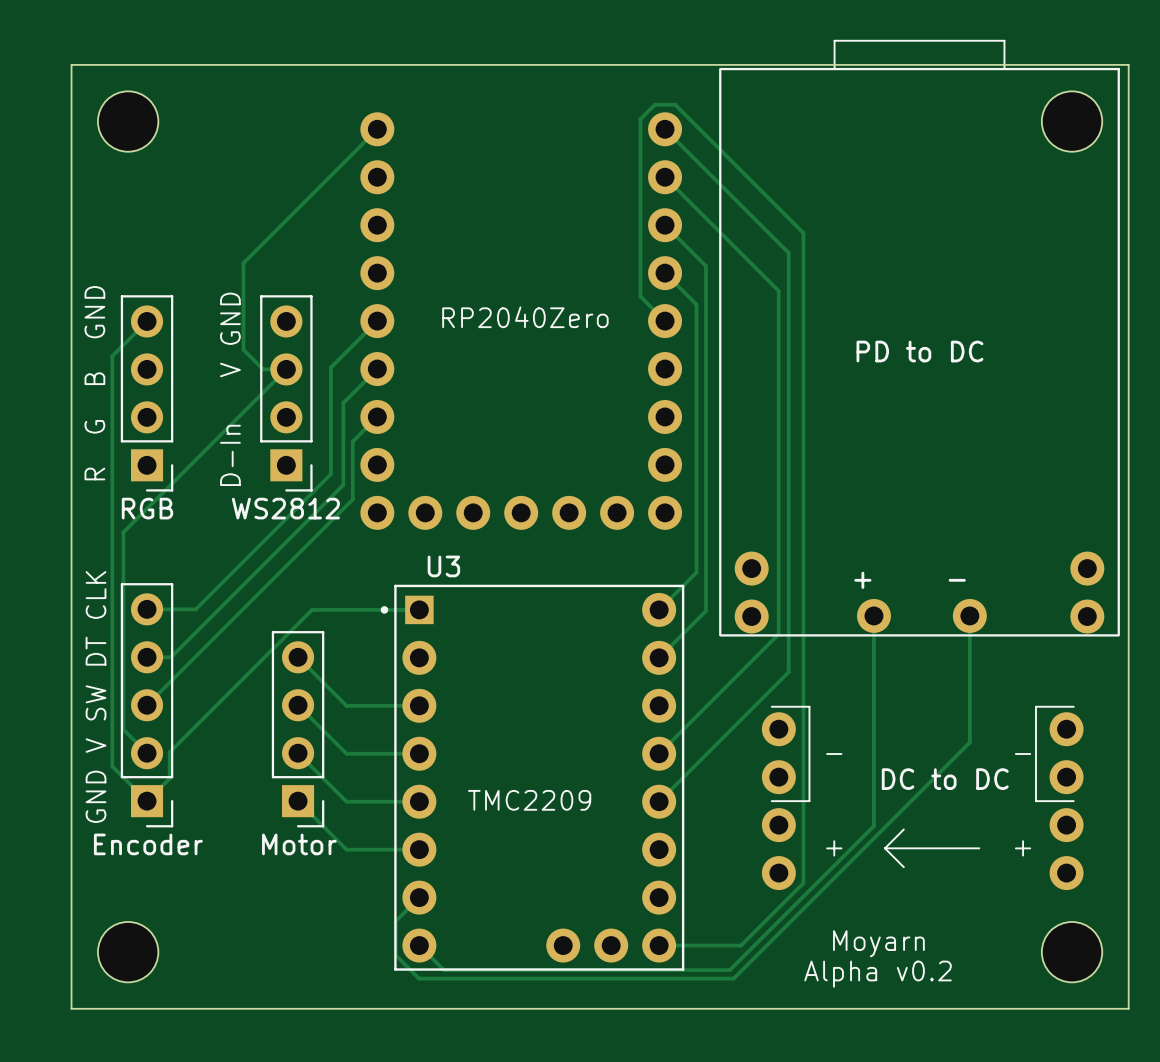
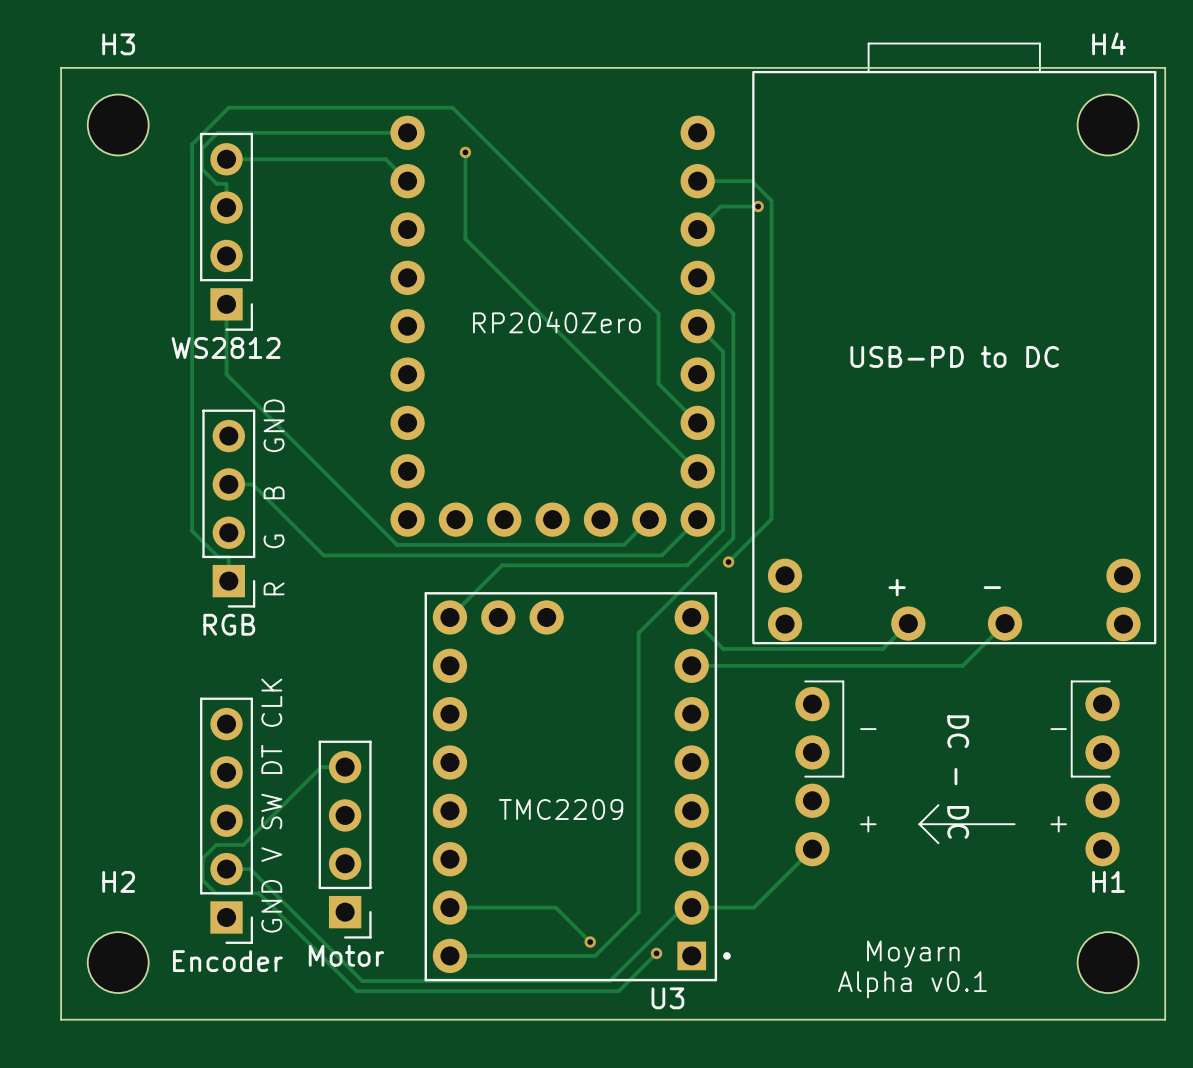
H4 name: none -> H4 (1108, 43)
board edge: (71, 64) (71, 1008) -> (99, 67) (61, 67) (61, 1019) (99, 1019)
H3: none -> (118, 125)
part: (128, 121) -> none
track: (377, 129) (243, 263) (243, 349) (263, 369) (286, 369) (123, 532) (123, 729) (147, 753) -> (407, 132) (217, 132) (201, 148) (201, 169) (216, 183) (226, 183) (226, 207)
track: (665, 129) (788, 252) (788, 672) (659, 801) -> none
track: none -> (465, 152) (465, 239) (697, 471)
via: none -> (465, 152)
track: none -> (226, 159) (385, 159) (407, 181)
track: (665, 177) (778, 290) (778, 634) (659, 753) -> (697, 181) (752, 181) (771, 200) (771, 519) (728, 562)
via: none -> (758, 206)
track: (665, 225) (706, 266) (706, 610) (659, 657) -> (697, 229) (720, 206) (758, 206)
track: none -> (226, 304) (226, 374) (397, 544) (624, 544) (649, 519)
track: (696, 304) (696, 572) (659, 609) -> (908, 623) (882, 648) (723, 648) (691, 617)
track: (147, 321) (112, 356) (112, 766) (147, 801) (169, 778) (169, 752) (312, 609) (419, 609) -> none
track: (377, 321) (330, 367) (330, 474) (195, 609) (147, 609) -> none
track: (665, 321) (640, 296) (640, 119) (654, 104) (675, 104) (803, 232) (803, 883) (741, 945) (659, 945) -> (697, 326) (723, 351) (723, 529) (687, 565) (502, 565) (449, 617)
text: PD to DC (919, 351) -> USB-PD to DC (954, 356)
track: (377, 369) (343, 403) (343, 484) (171, 657) (147, 657) -> none
text: D-In V GND (230, 389) -> none
RGB: (147, 393) -> none
WS2812 position: (286, 393) -> (226, 231)
track: (377, 416) (352, 441) (352, 499) (147, 705) -> none
track: none -> (697, 422) (658, 383) (658, 313) (452, 107) (228, 107) (192, 144) (192, 531) (218, 557) (228, 557) (228, 581)
track: none -> (228, 484) (252, 484) (323, 555) (661, 555) (697, 519)
RGB: none -> (228, 508)
via: none -> (728, 562)
track: (873, 615) (873, 826) (729, 970) (443, 970) (419, 945) -> (729, 309) (733, 313) (733, 538) (638, 633) (638, 912) (595, 955) (449, 955)
track: (969, 615) (969, 742) (733, 978) (419, 978) (395, 955) (395, 921) (419, 897) -> (1005, 623) (962, 665) (691, 665)
track: (298, 657) (346, 705) (419, 705) -> none
Encoder: (147, 705) -> none
track: (298, 705) (346, 753) (419, 753) -> none
Motor position: (298, 729) -> (345, 839)
track: (298, 753) (346, 801) (419, 801) -> none
track: none -> (345, 767) (321, 767) (243, 844) (216, 844) (202, 858) (202, 880) (215, 893) (258, 893) (356, 991) (618, 991) (656, 953)
DC - DC: none -> (957, 773)
U3 rotation: 0° (532, 777) -> 180° (577, 786)
DC to DC: (922, 797) -> none
track: (298, 801) (346, 849) (419, 849) -> none
Encoder: none -> (226, 820)
track: none -> (812, 849) (754, 907) (683, 907) (610, 981) (362, 981) (250, 869) (226, 869)
H1 name: none -> H1 (1108, 881)
track: none -> (449, 907) (555, 907) (590, 942)
via: none -> (590, 942)
via: none -> (656, 953)
H2: none -> (118, 962)
part: (128, 952) -> none
text: Alpha v0.2 (878, 974) -> Alpha v0.1 (912, 984)

